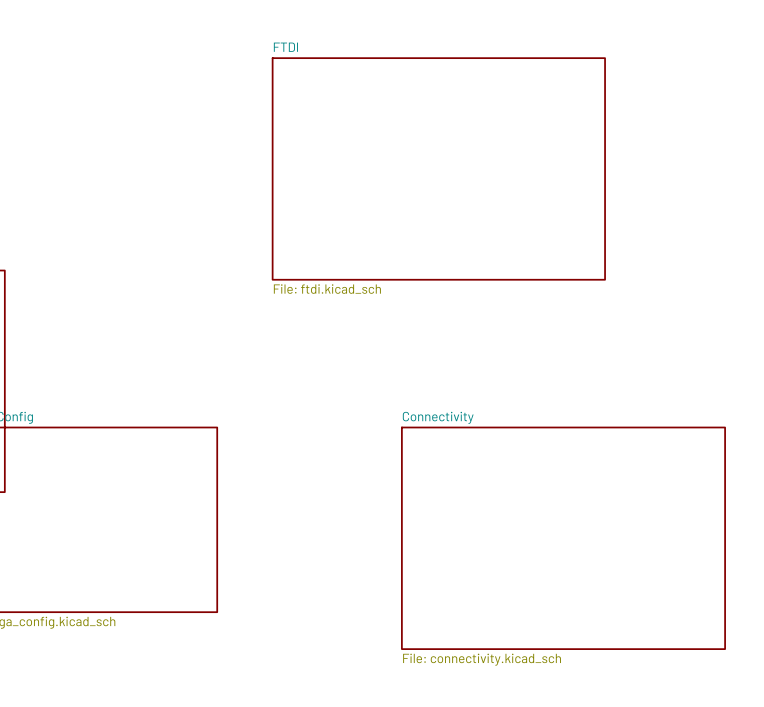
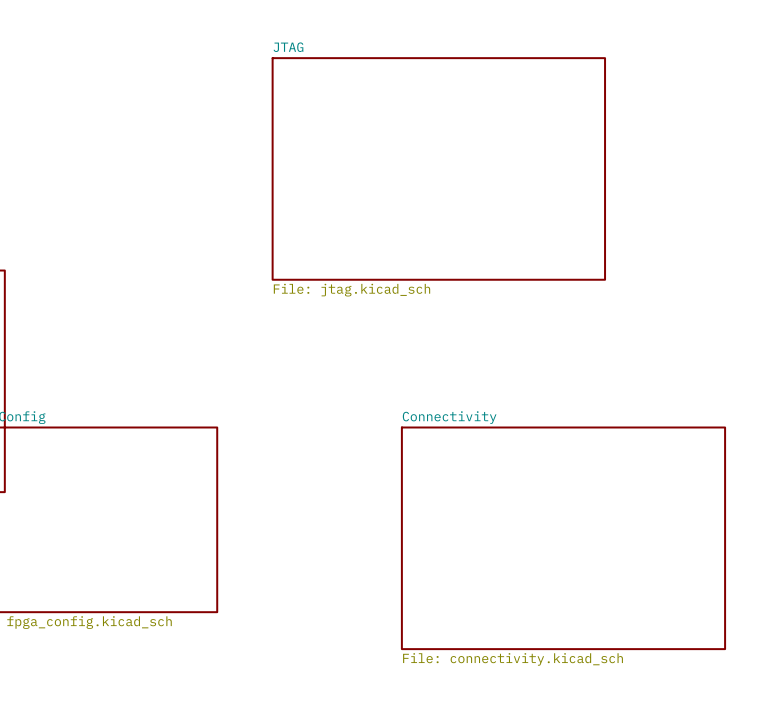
sheet FTDI name: FTDI (285, 47) -> JTAG (288, 47)
sheet FTDI value: File: ftdi.kicad_sch (327, 289) -> File: jtag.kicad_sch (351, 290)

